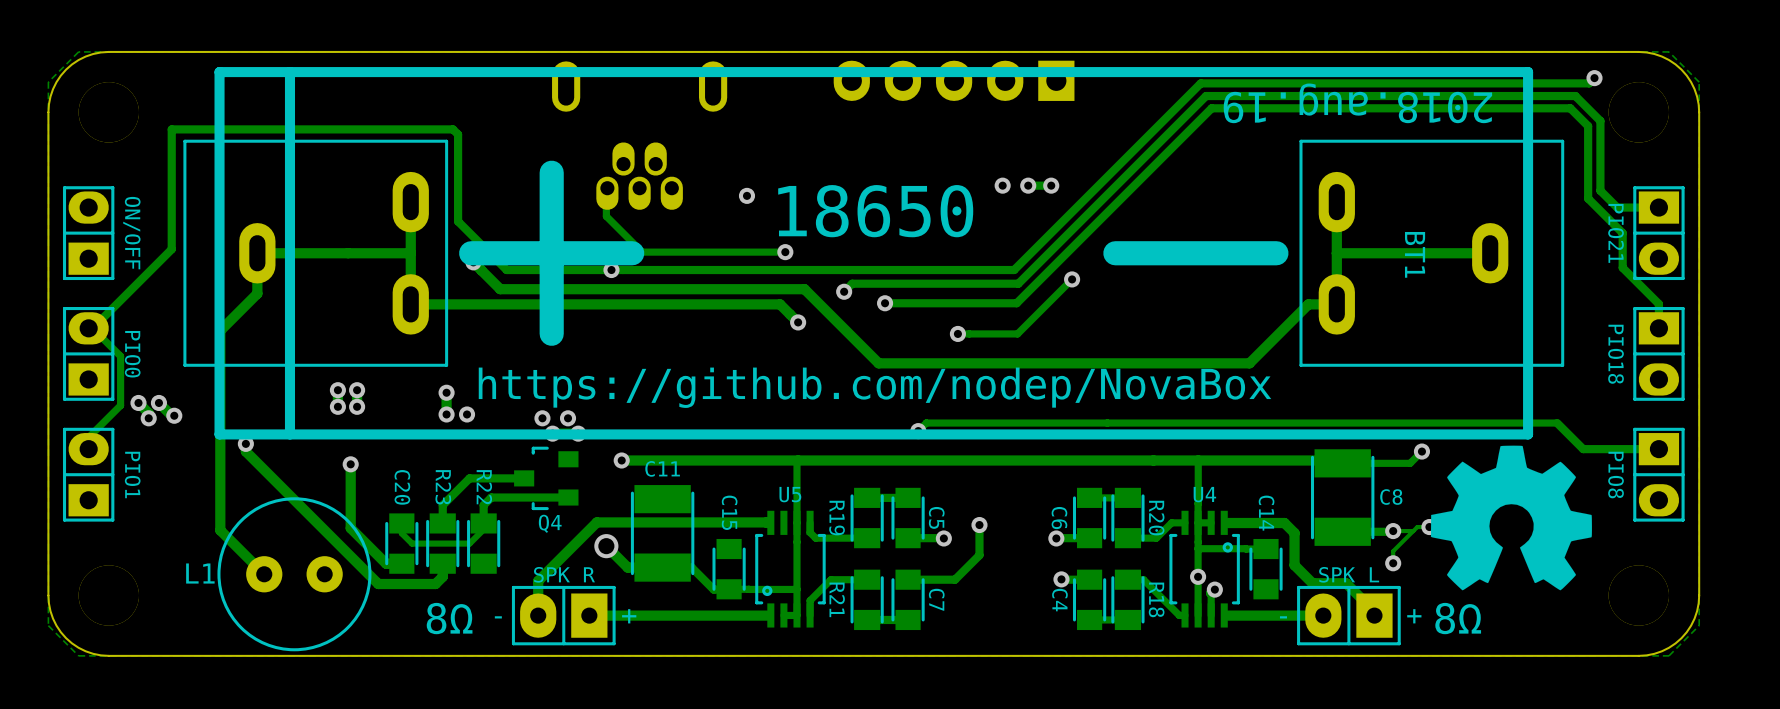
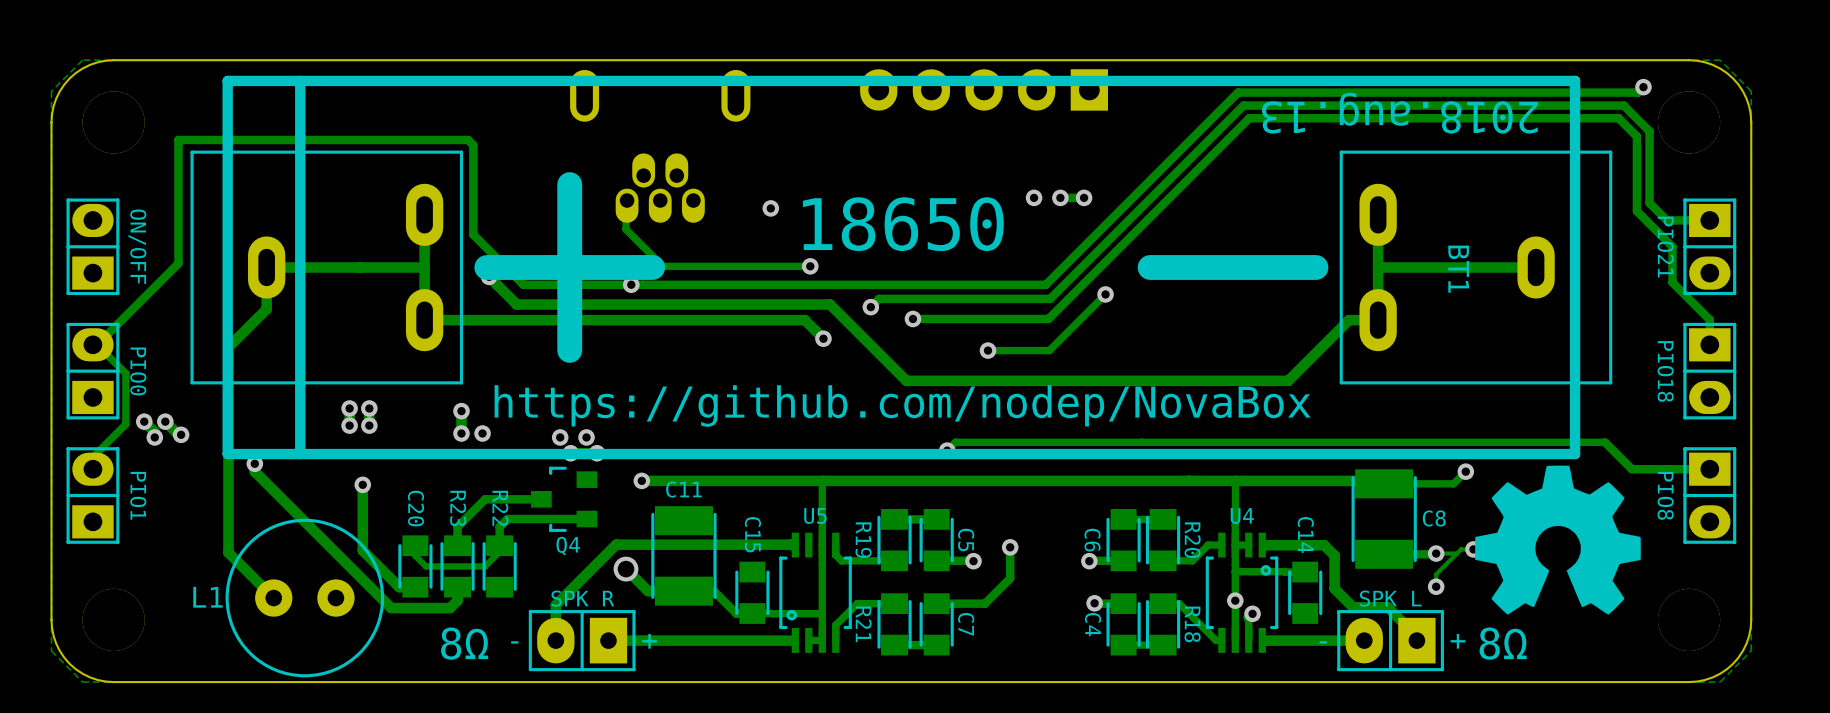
text: 2018.aug.19 (1357, 103) -> 2018.aug.13 (1400, 113)

